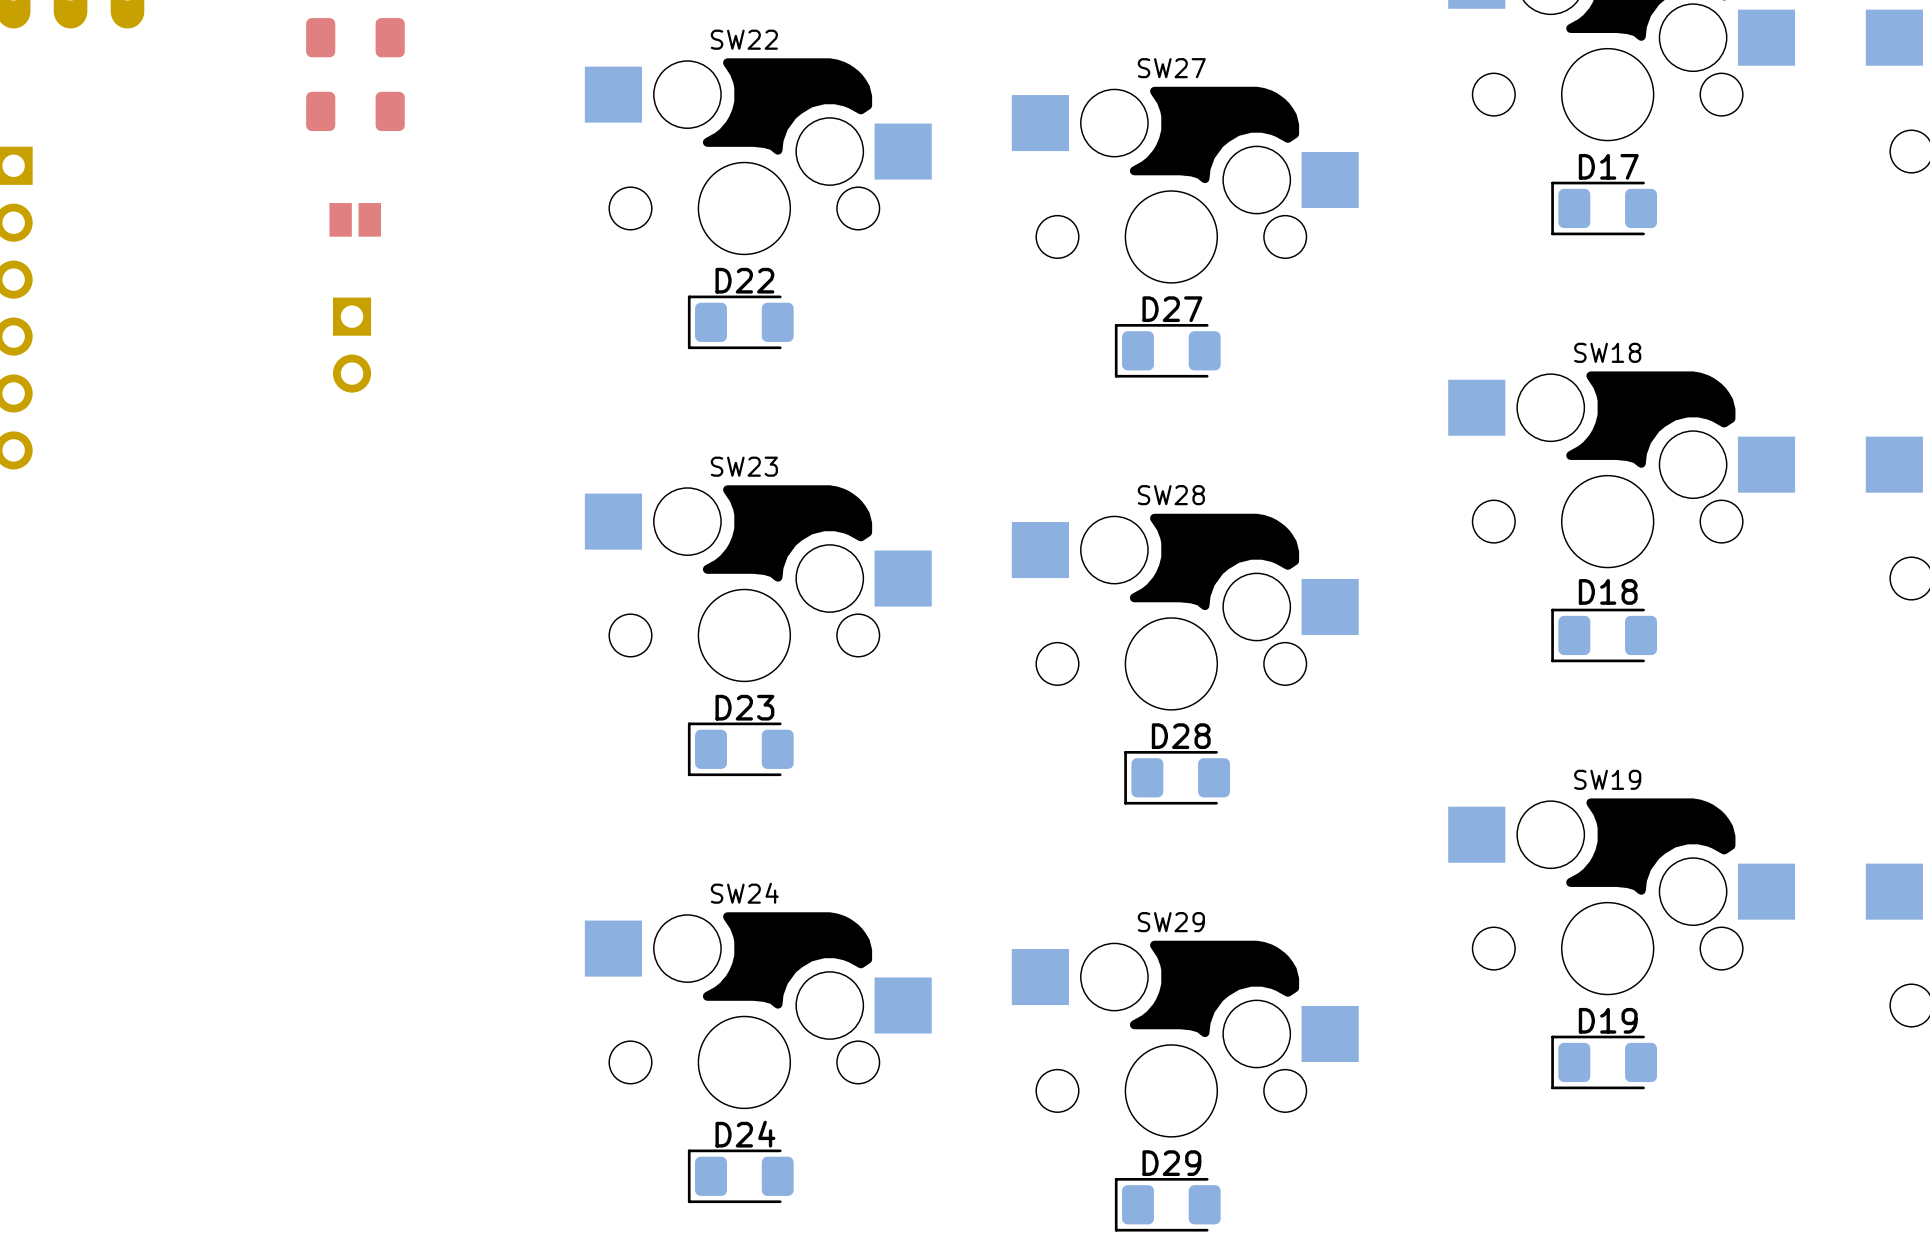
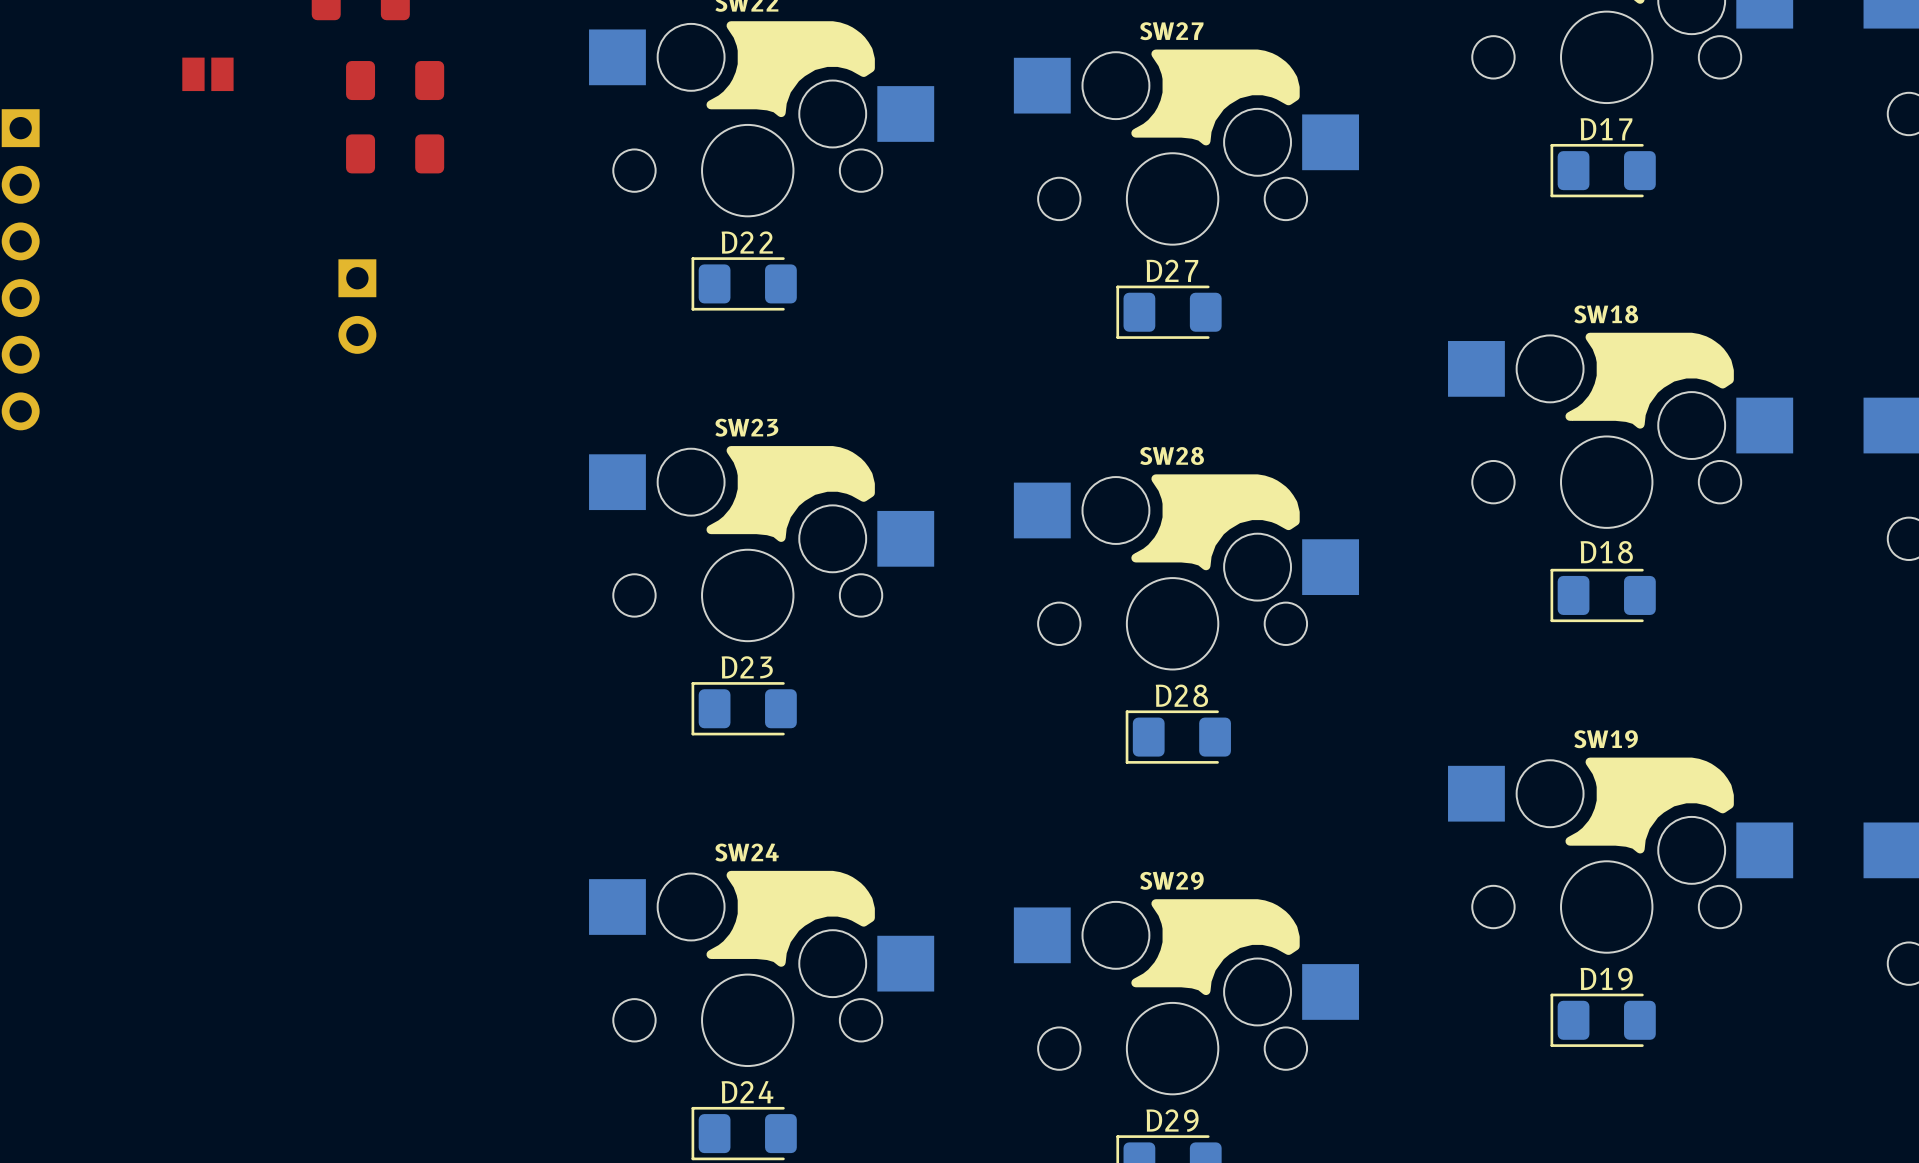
part position: (355, 111) -> (395, 80)
part: none -> (395, 153)
part position: (355, 219) -> (207, 74)

